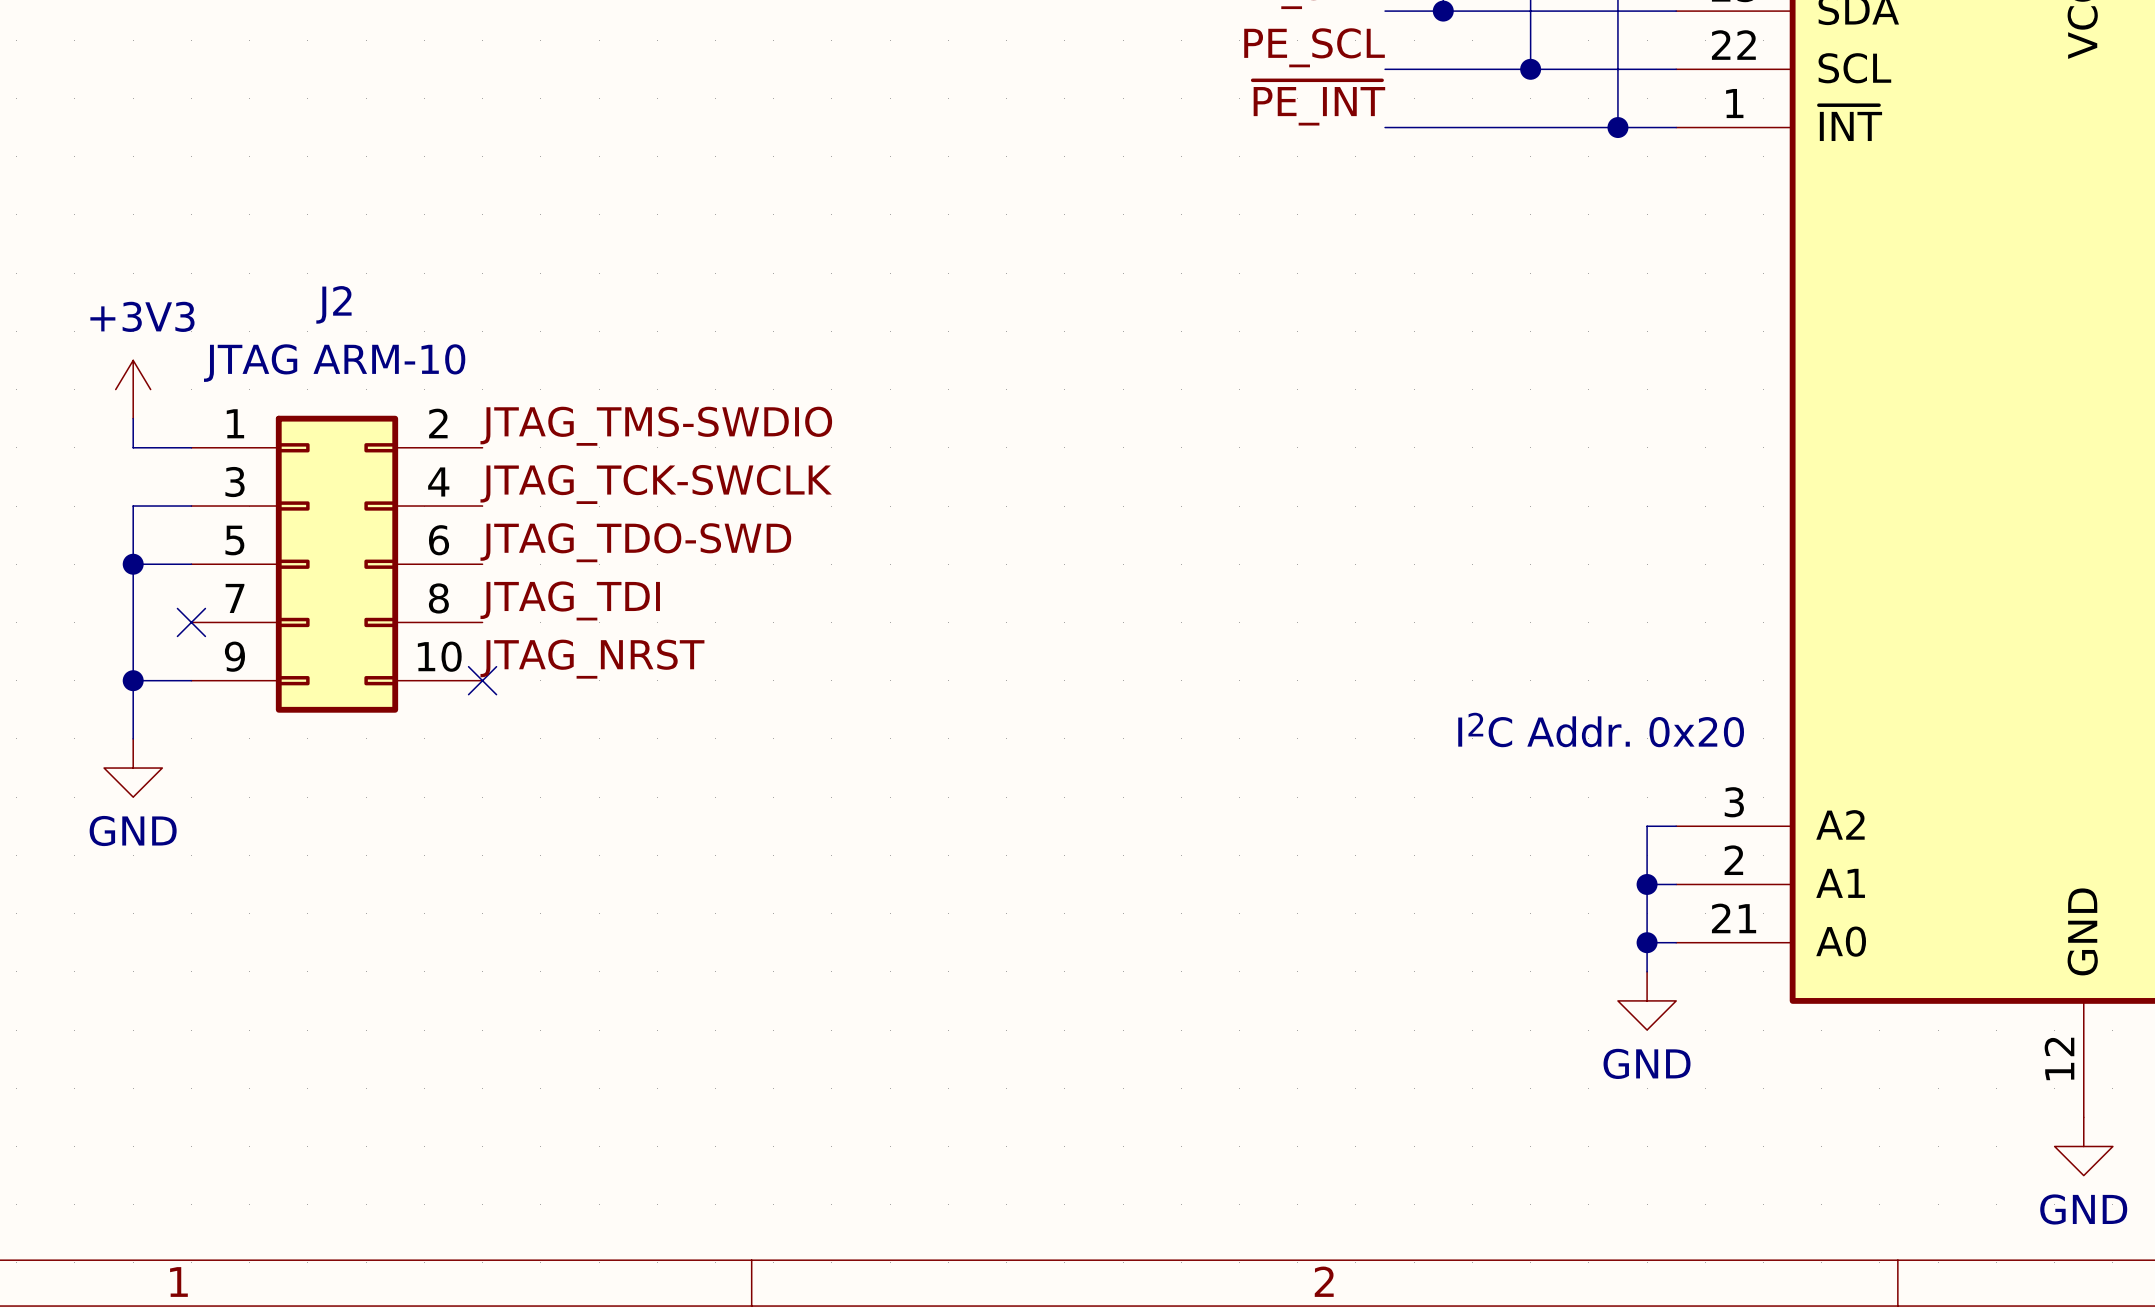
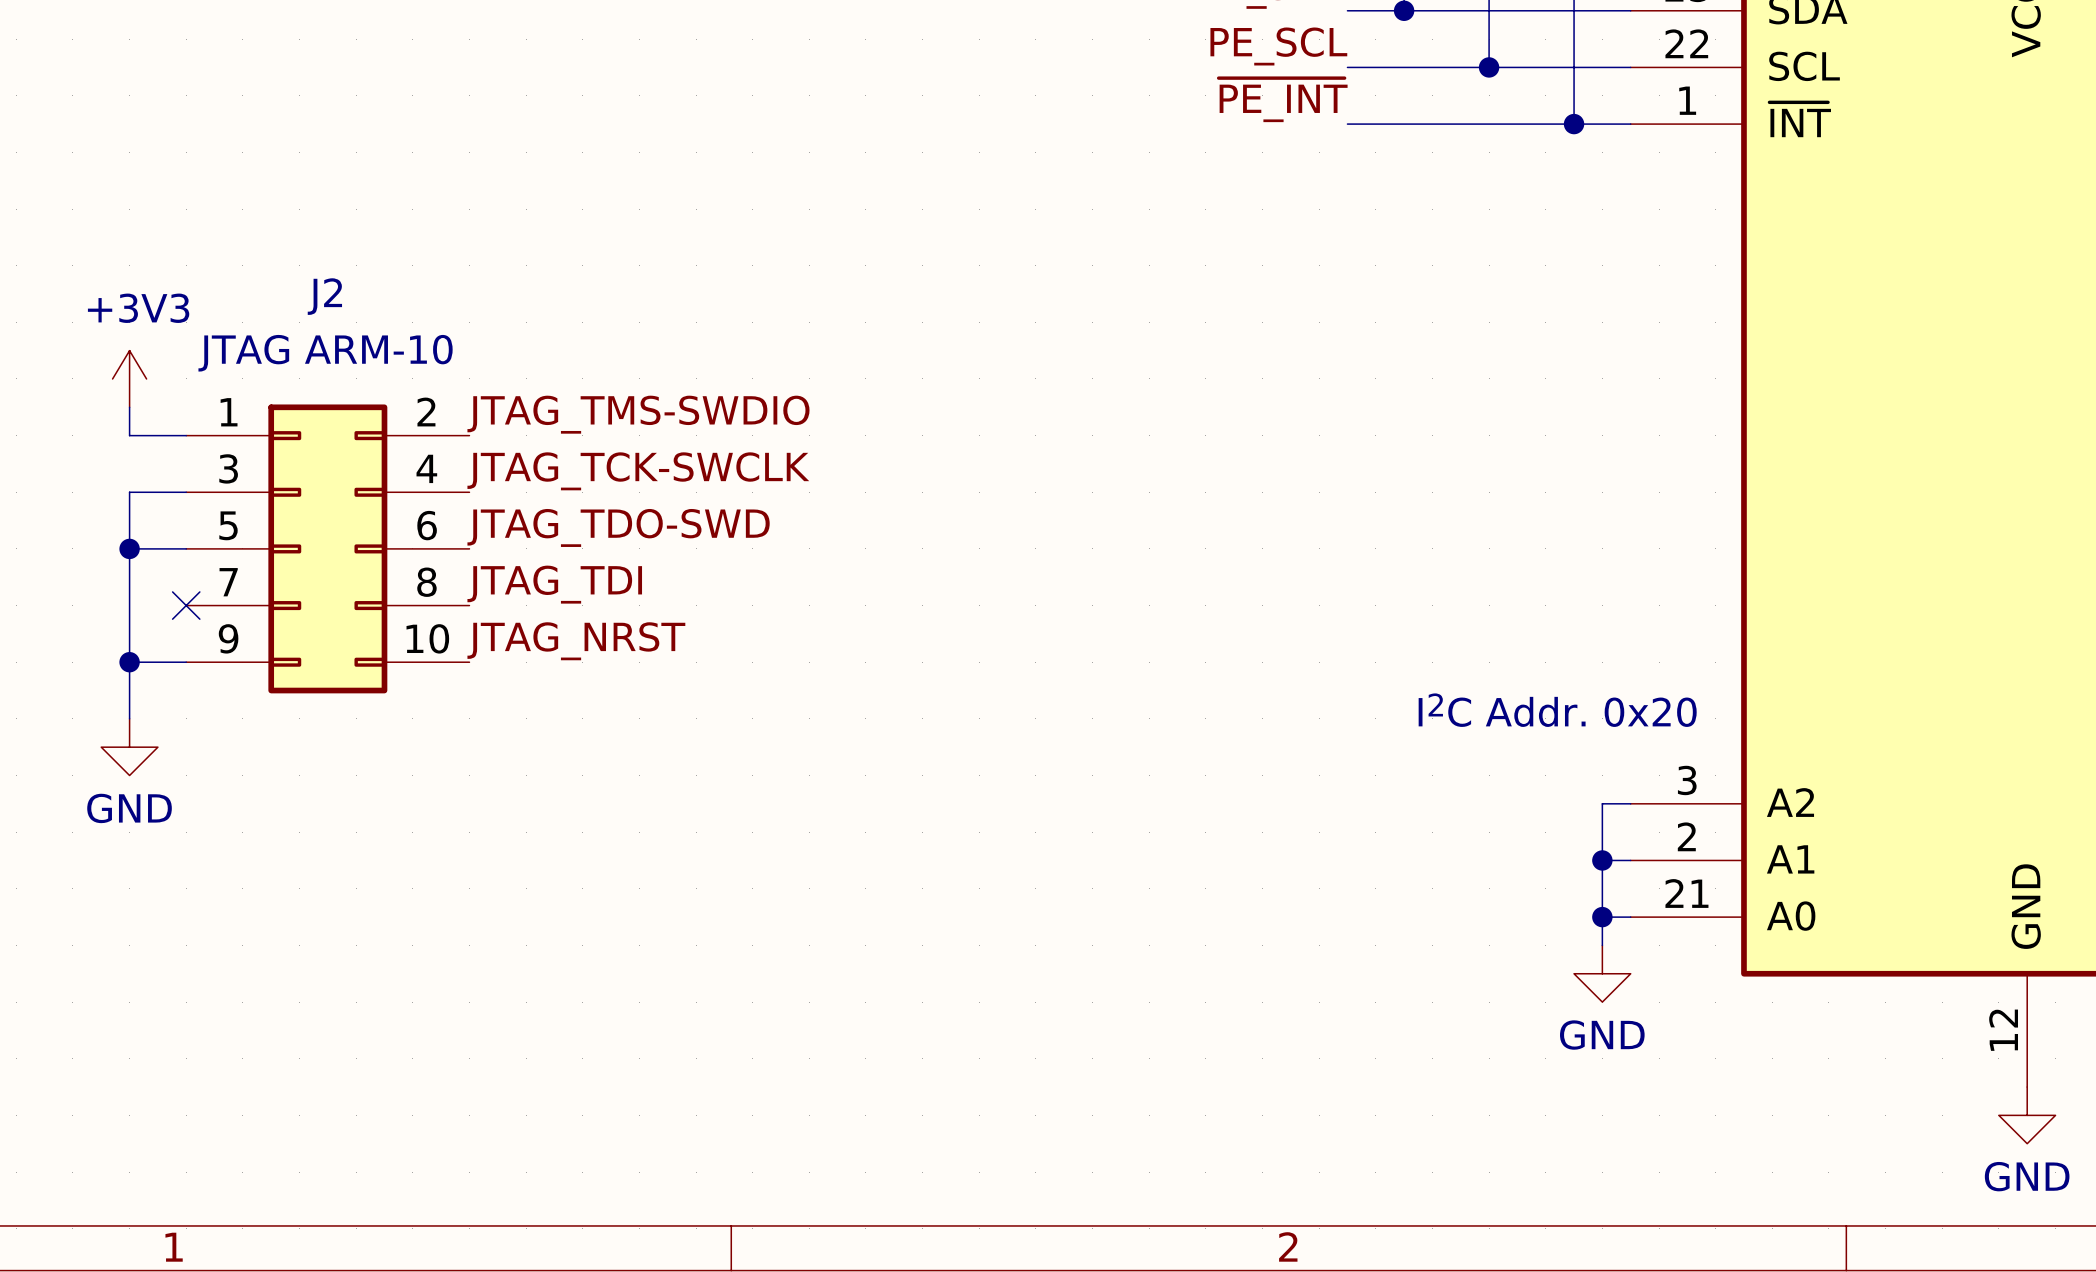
no-connect mark: (482, 680) -> none

